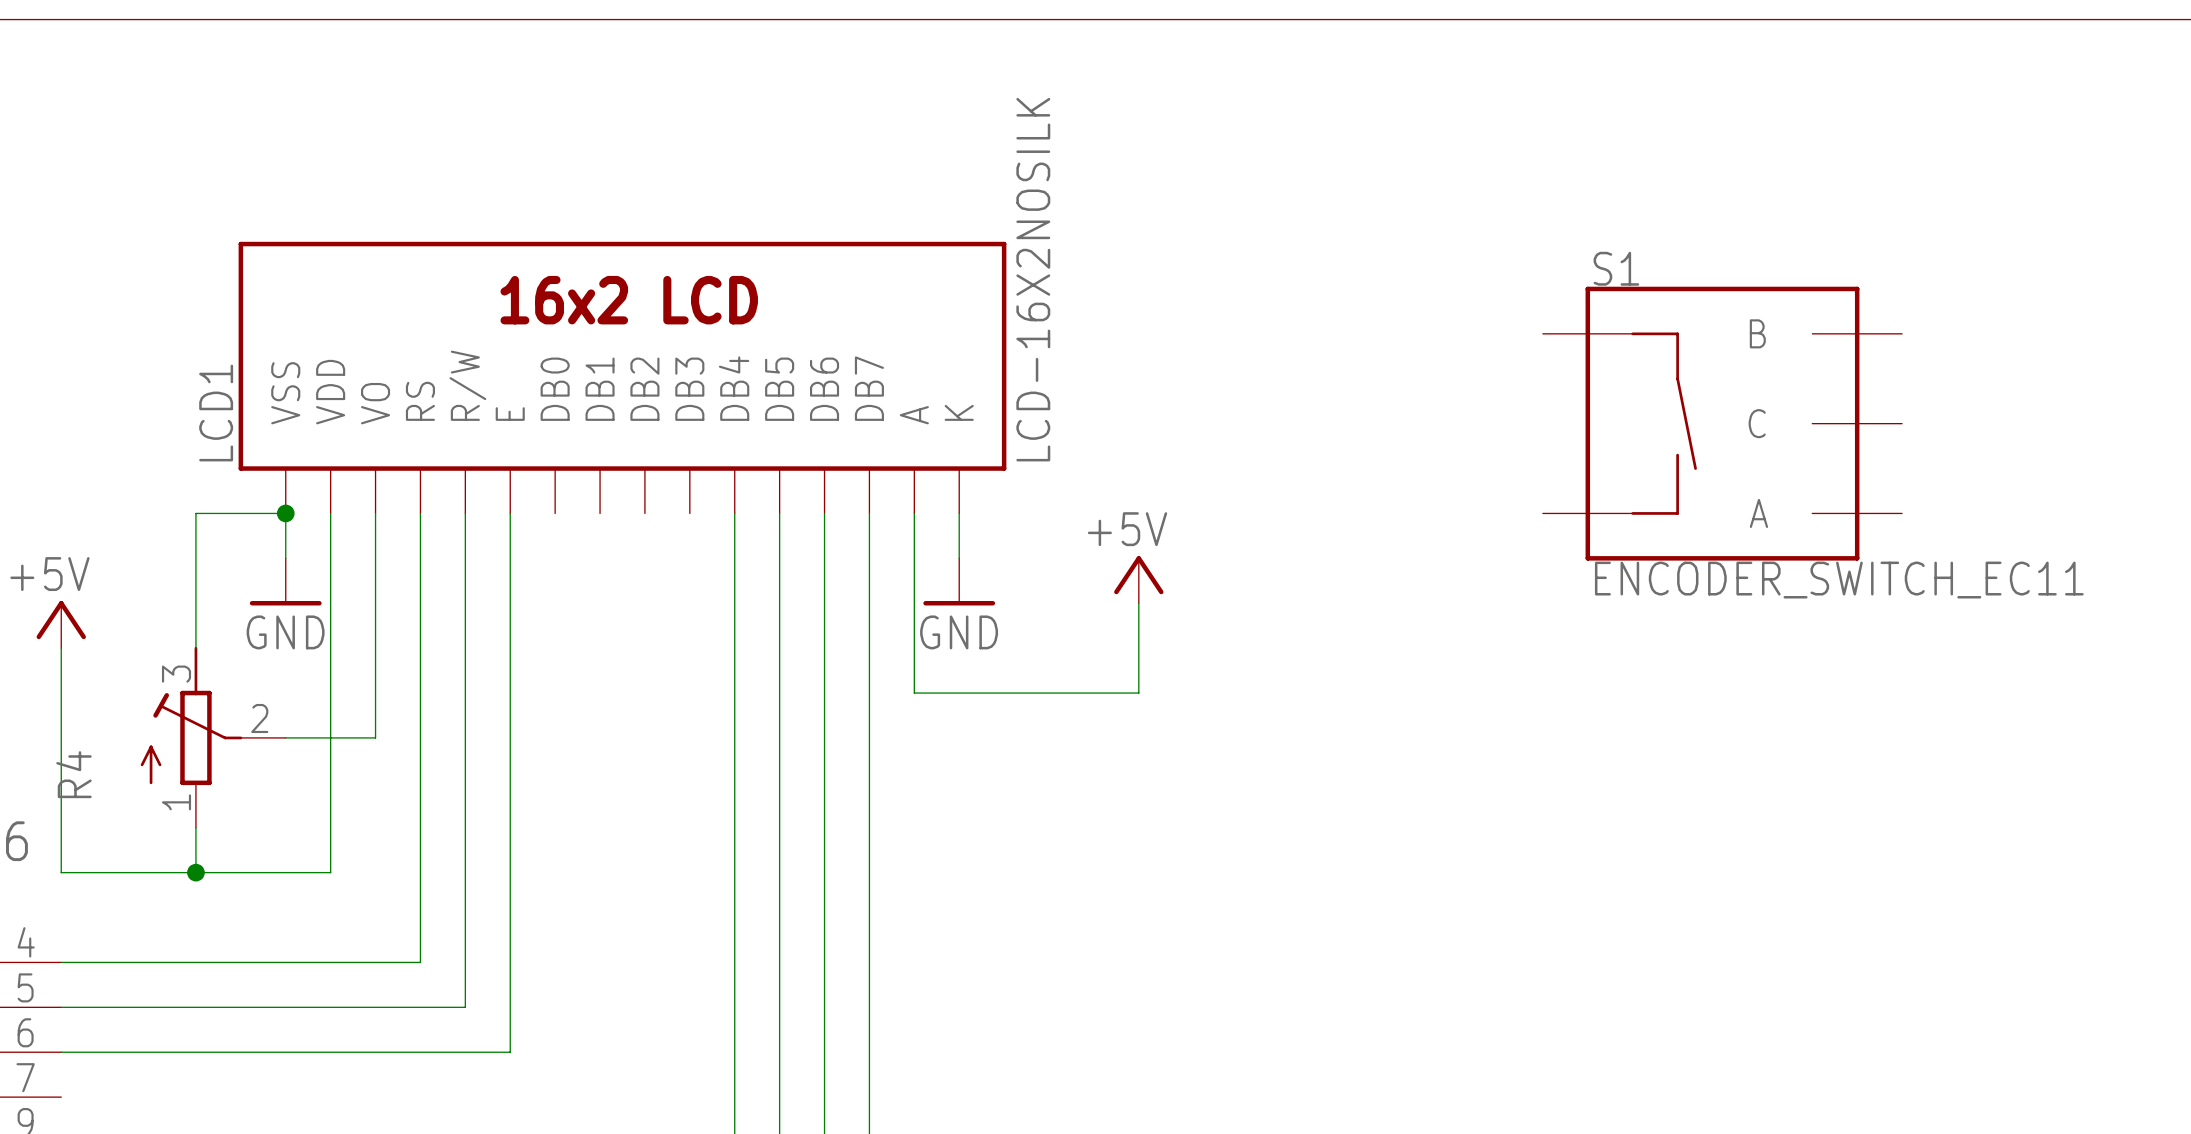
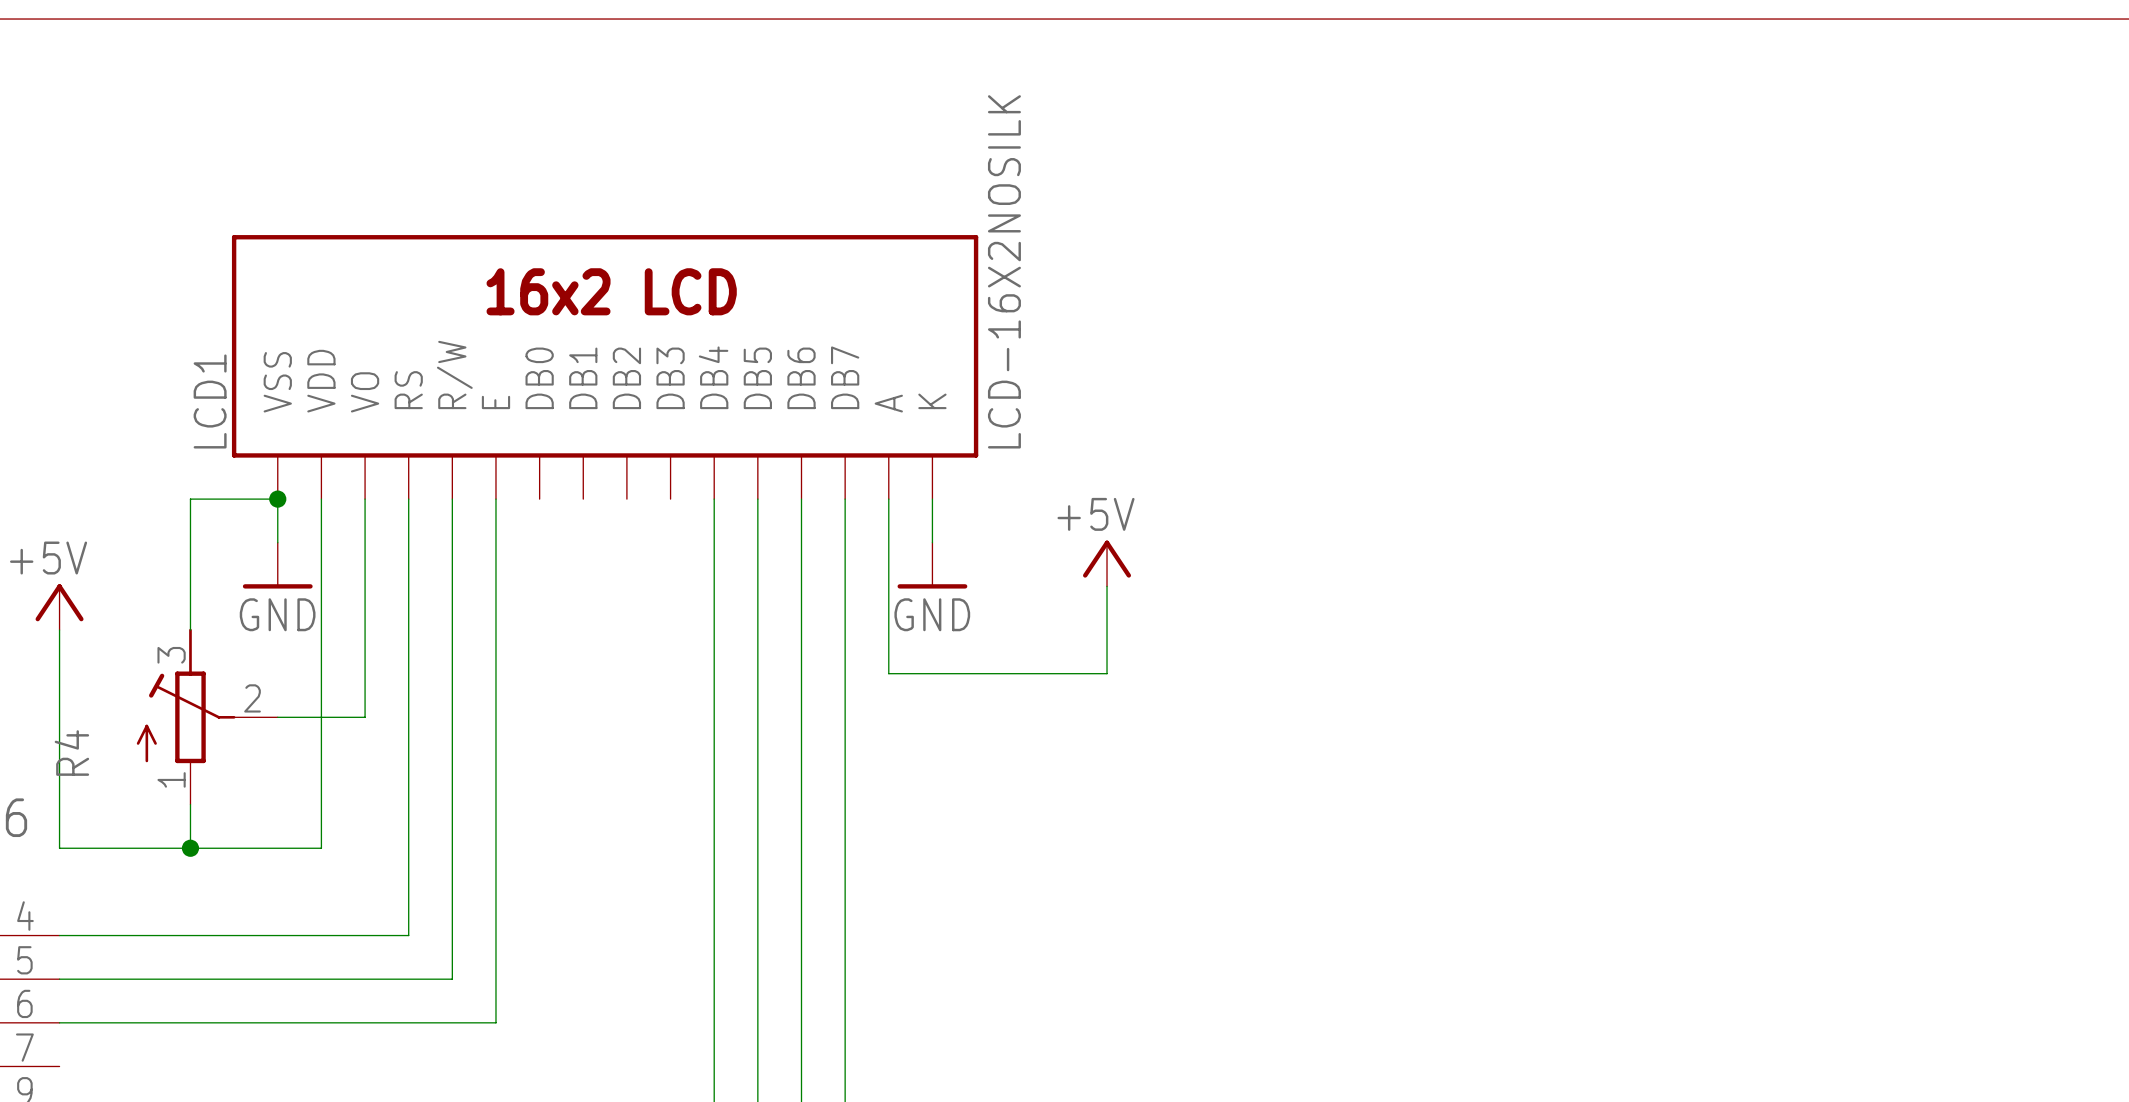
S1: ENCODER_SWITCH_EC11 (1722, 423) -> none

